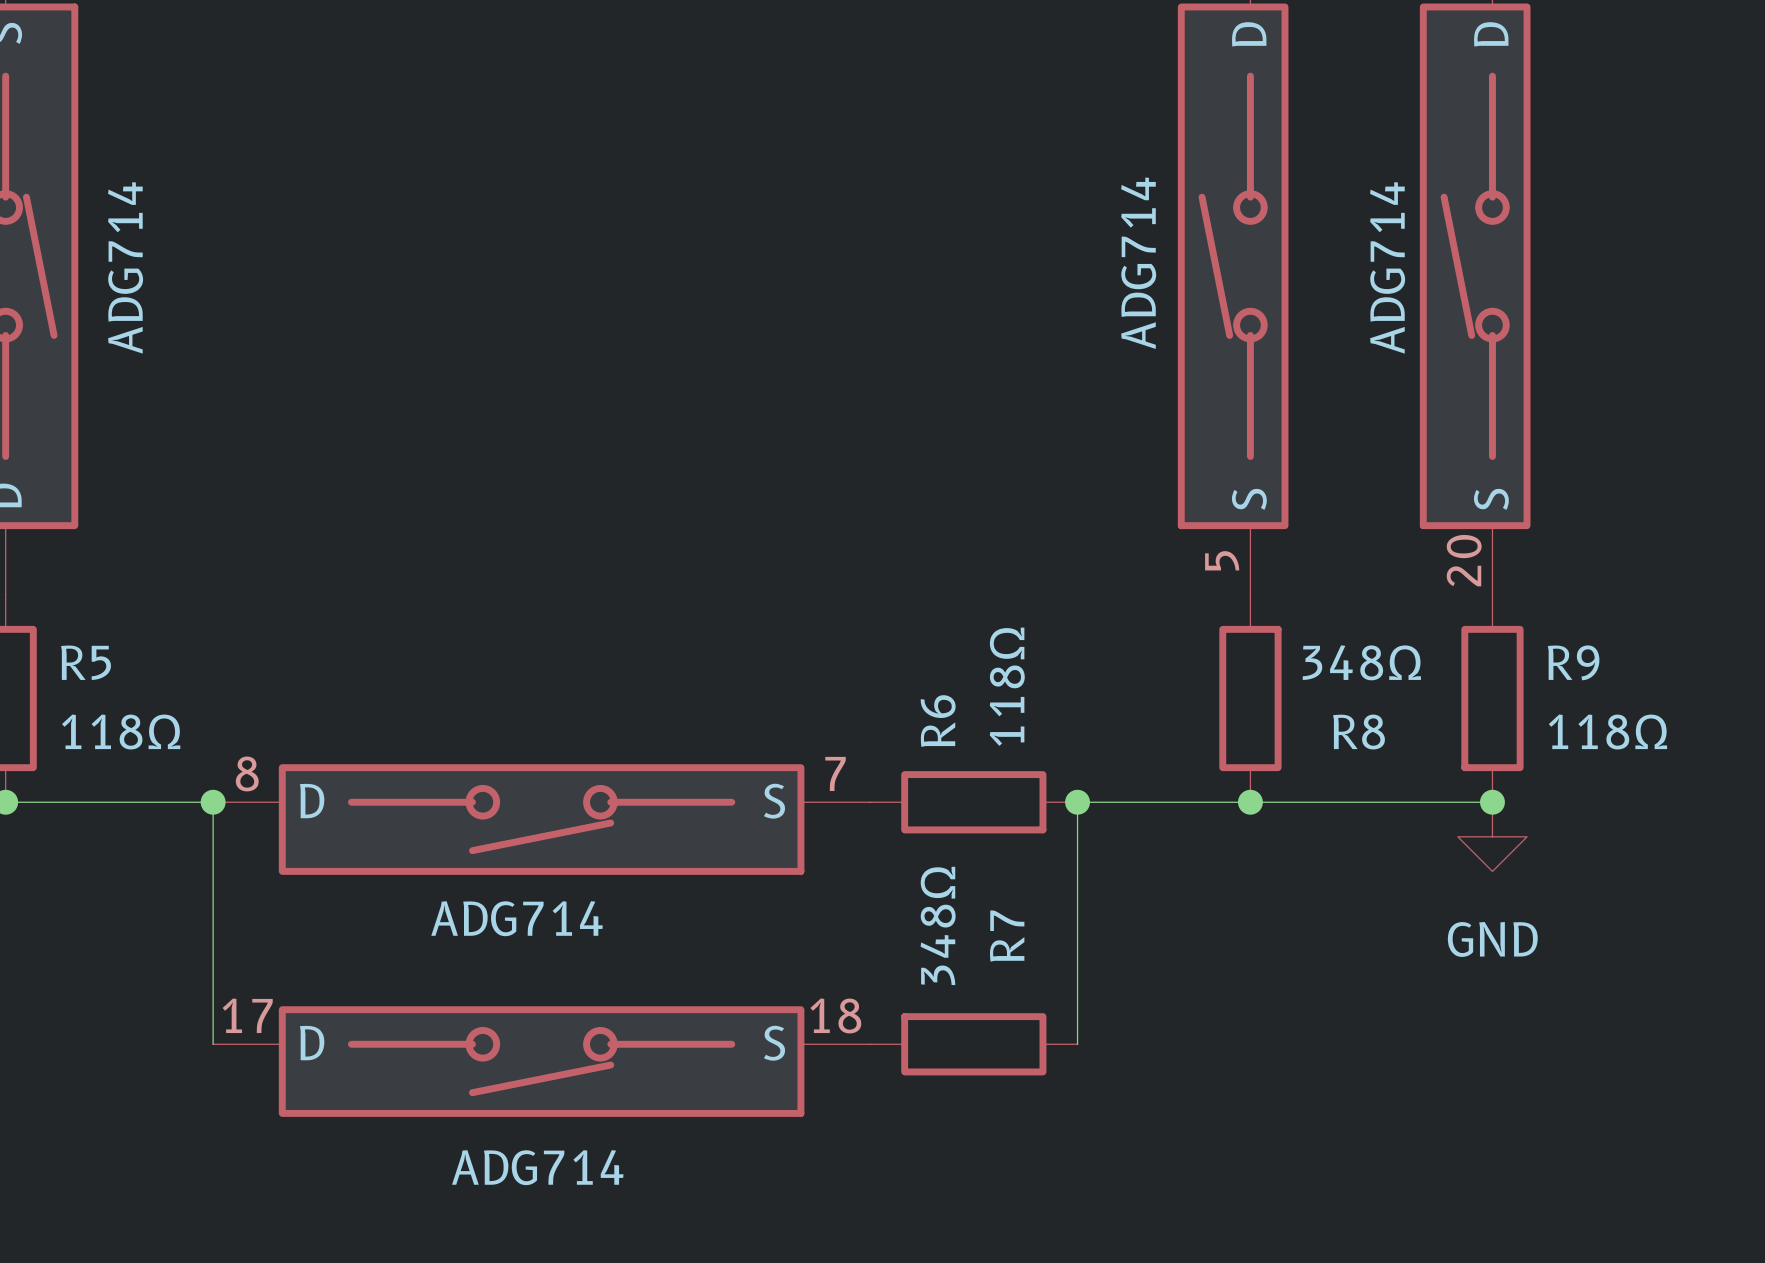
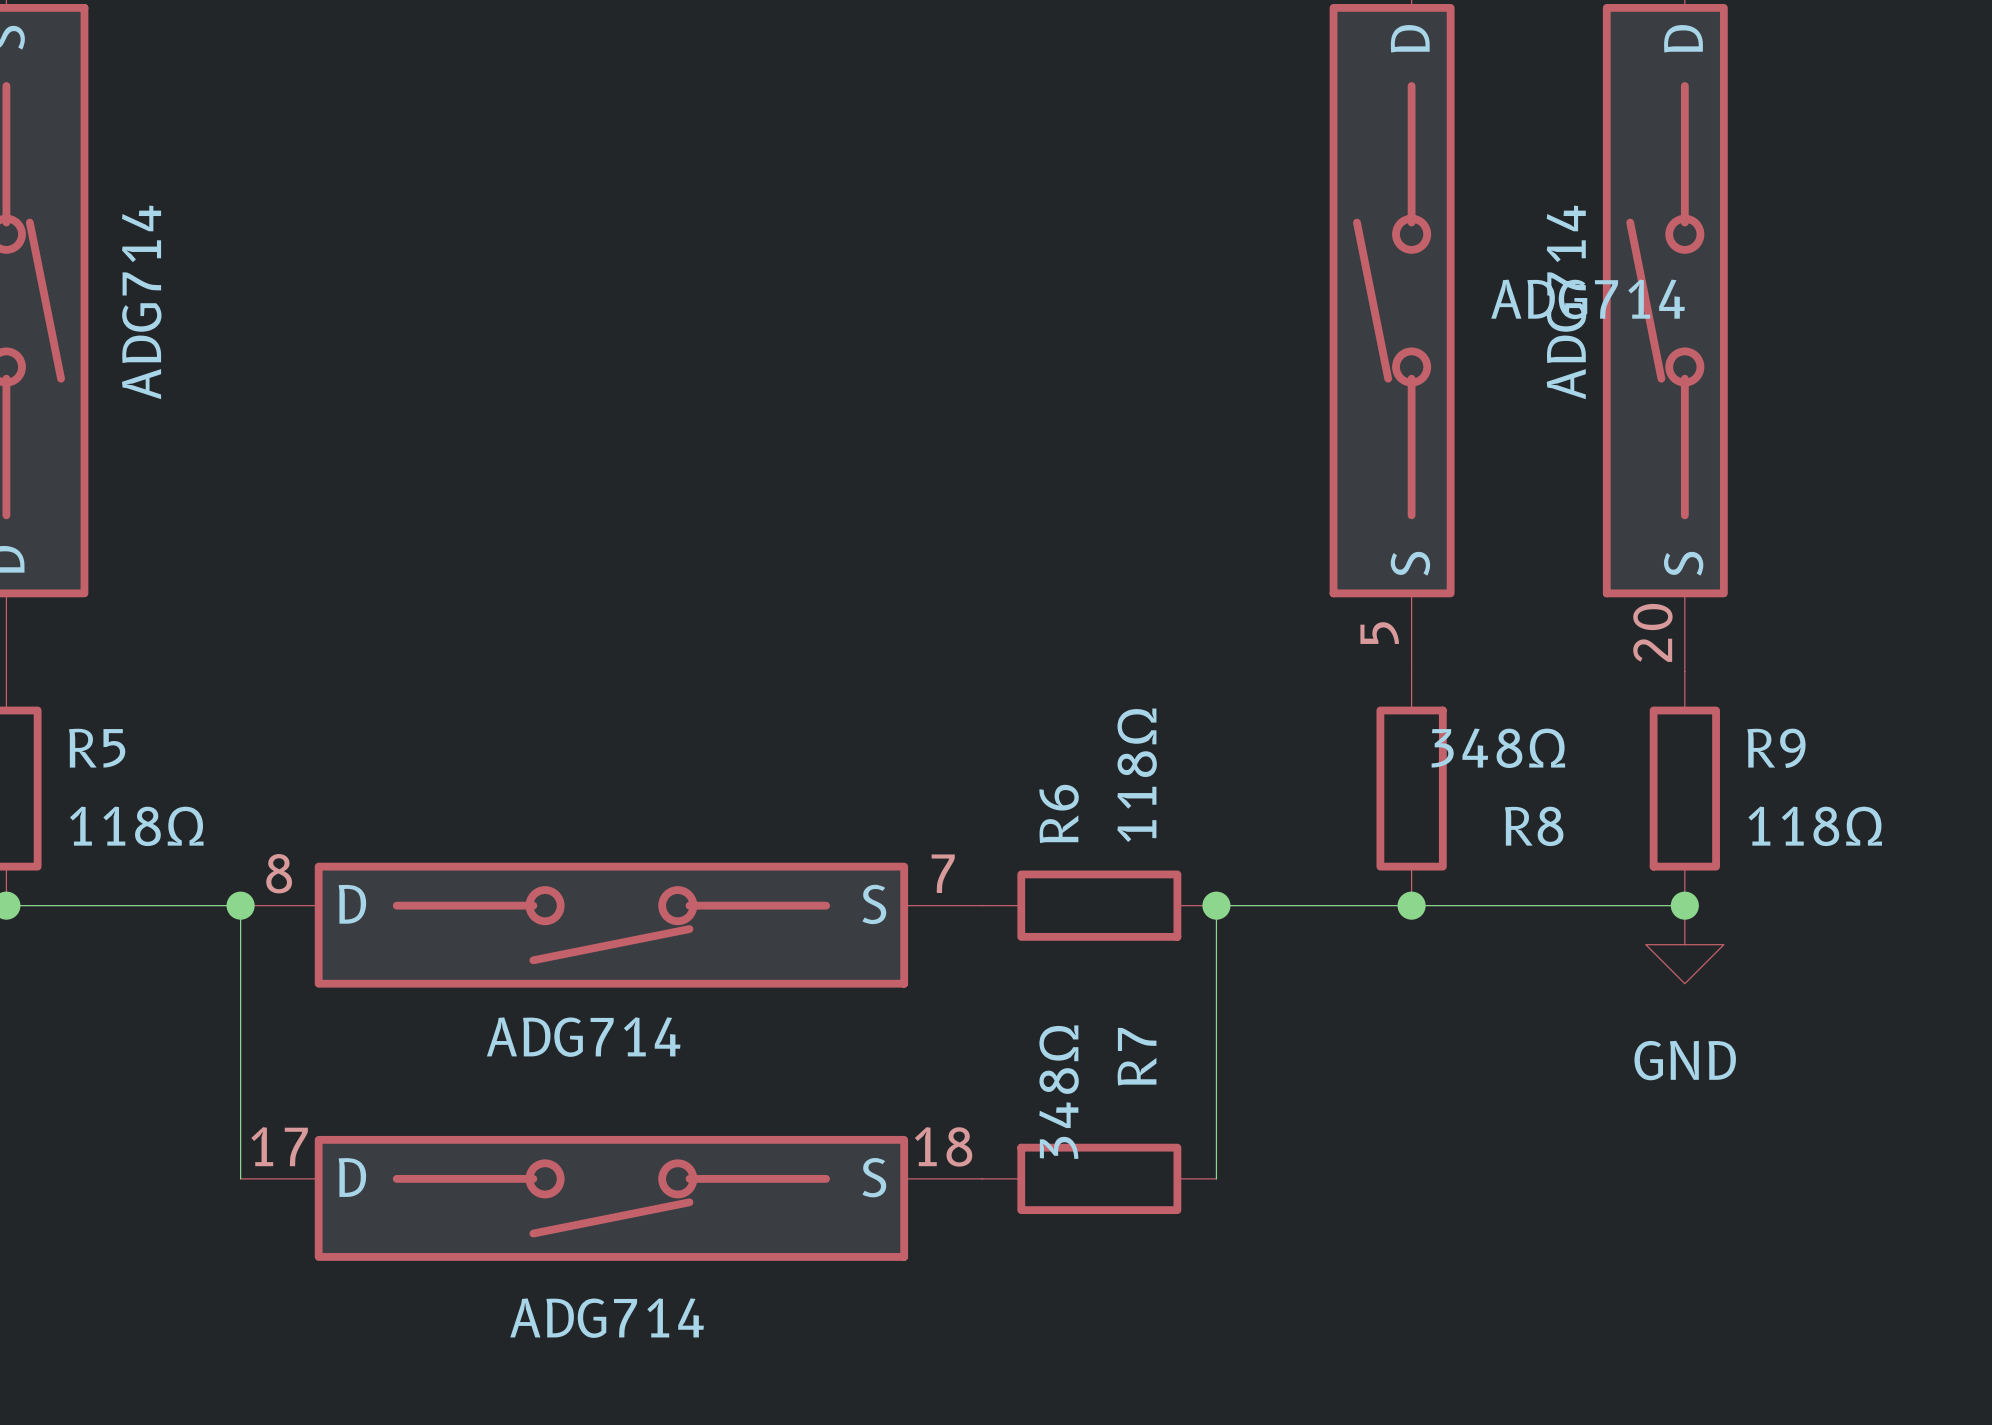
part value rotation: 0° (1138, 263) -> 90° clockwise (1588, 299)
part value position: ADG714 (1138, 263) -> ADG714 (1588, 299)
R8 value position: 348Ω (1361, 662) -> 348Ω (1498, 748)
R7 value position: 348Ω (938, 925) -> 348Ω (1059, 1092)

